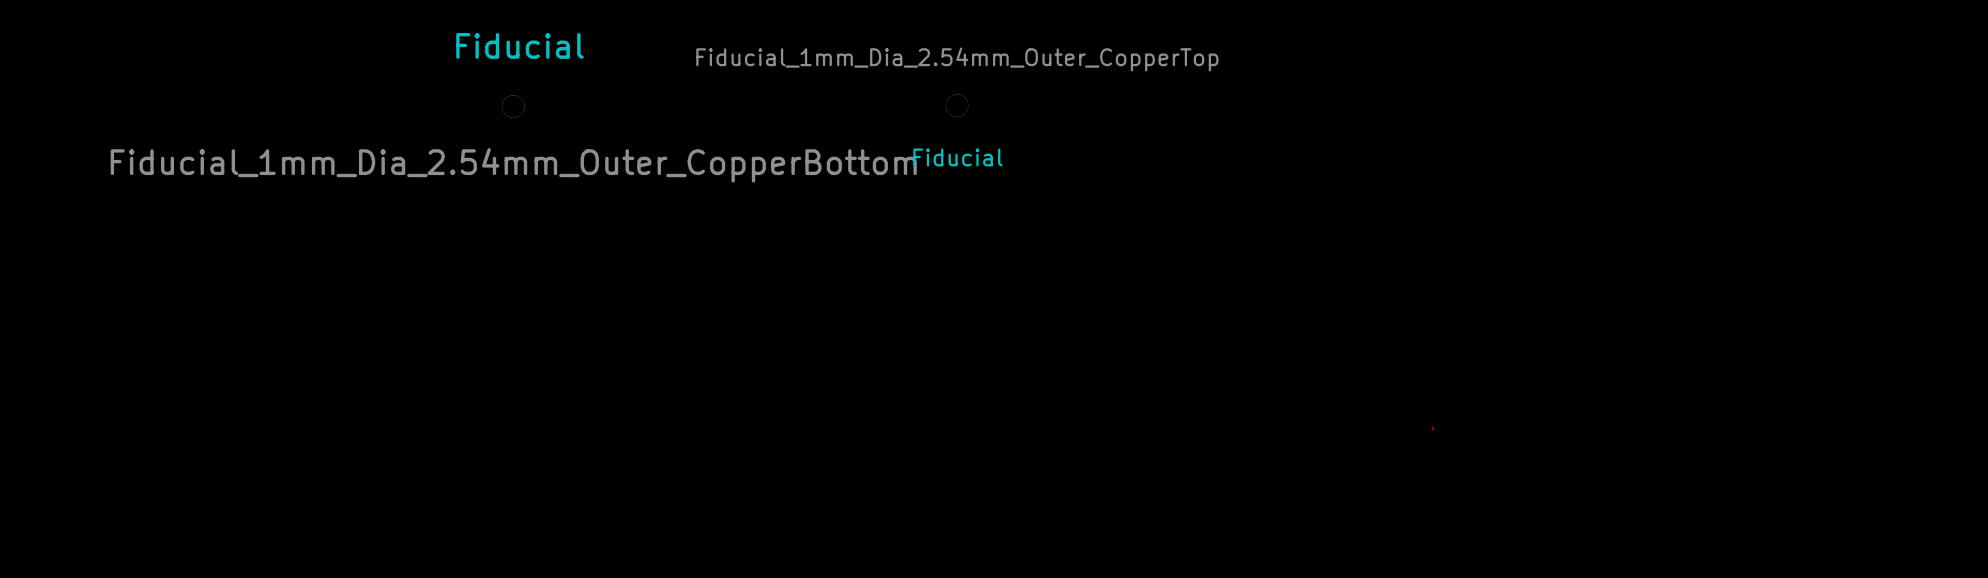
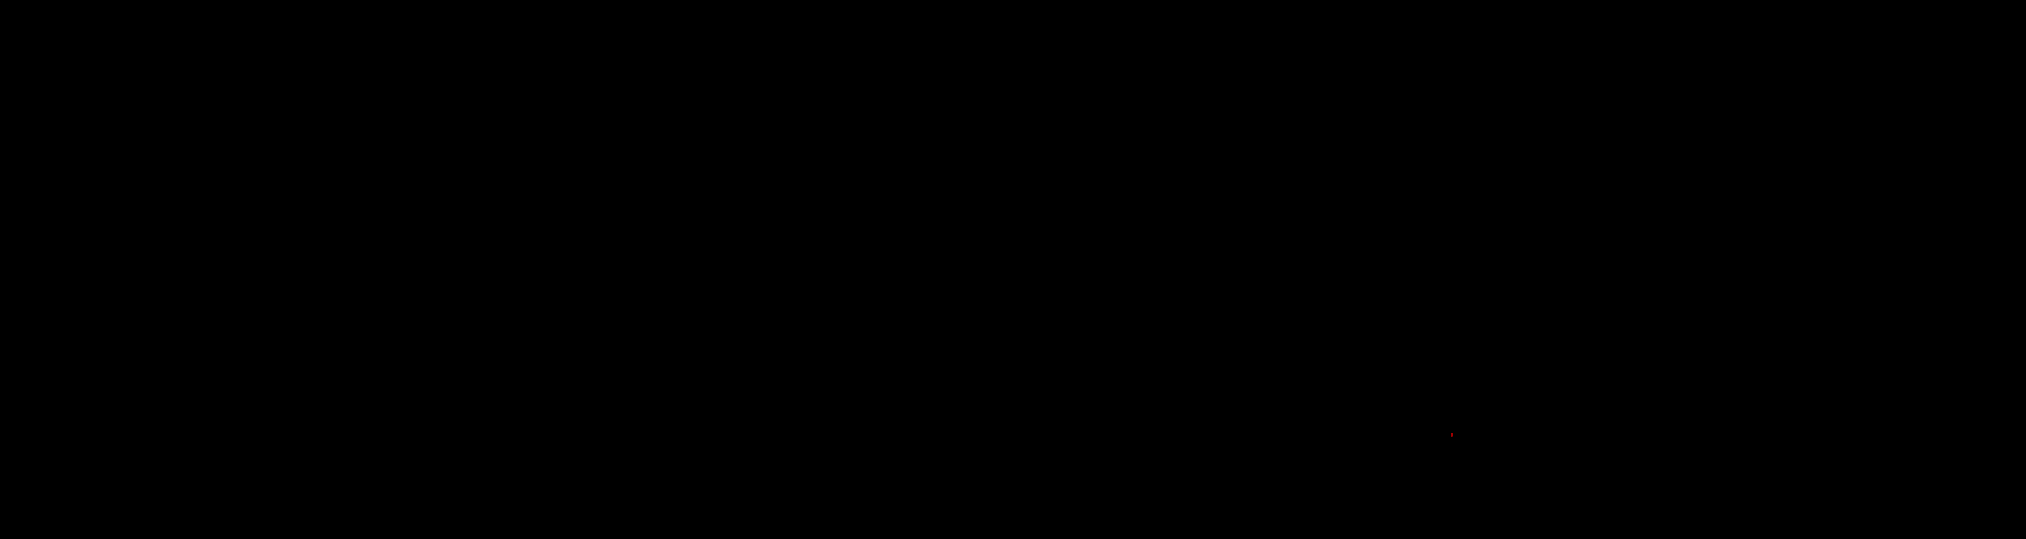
Fiducial: Fiducial_1mm_Dia_2.54mm_Outer_CopperTop (957, 105) -> none
Fiducial: Fiducial_1mm_Dia_2.54mm_Outer_CopperBottom (513, 106) -> none

